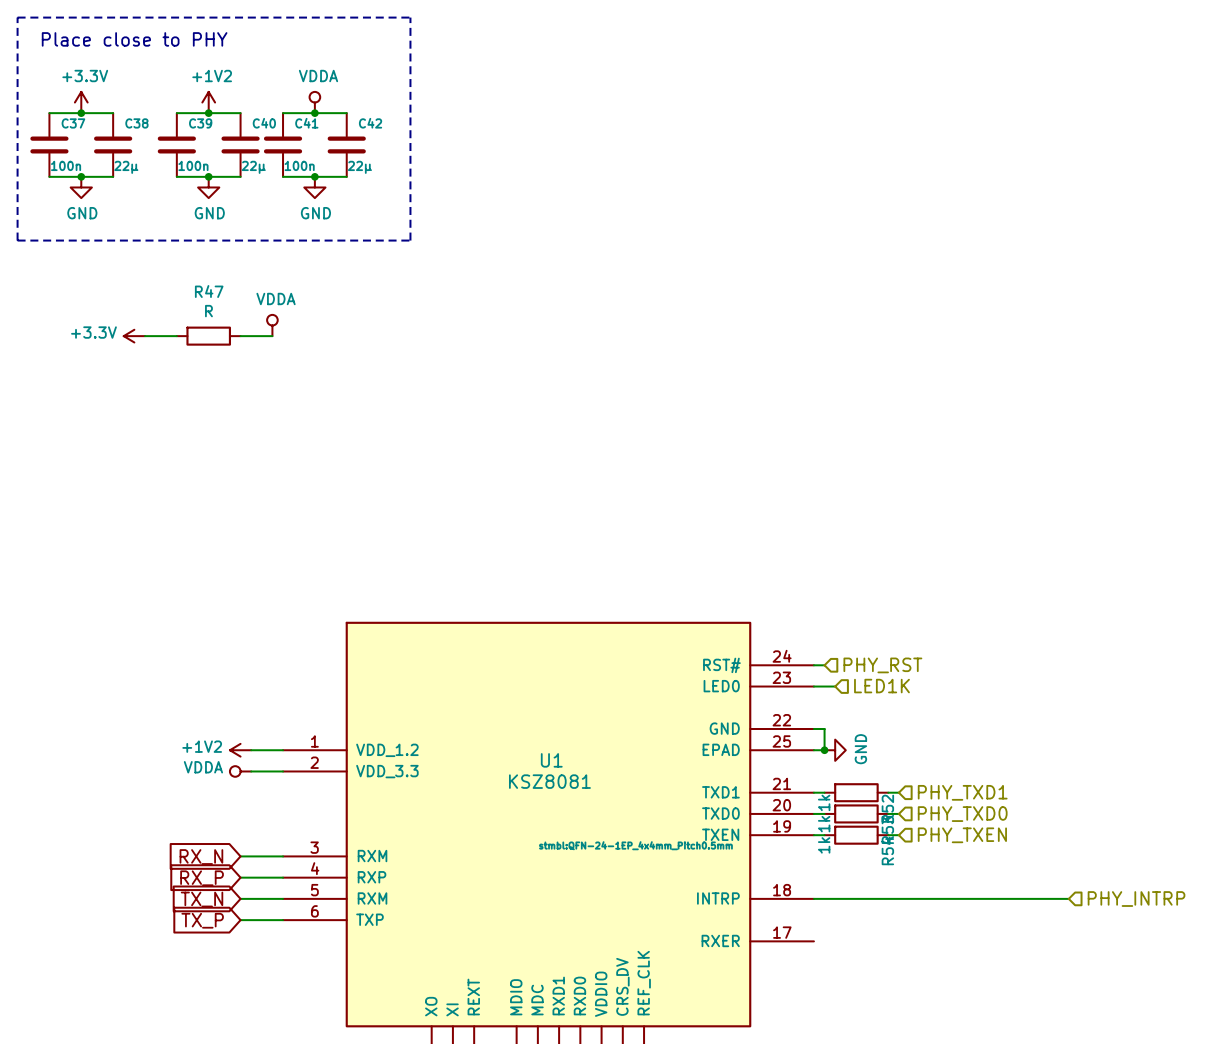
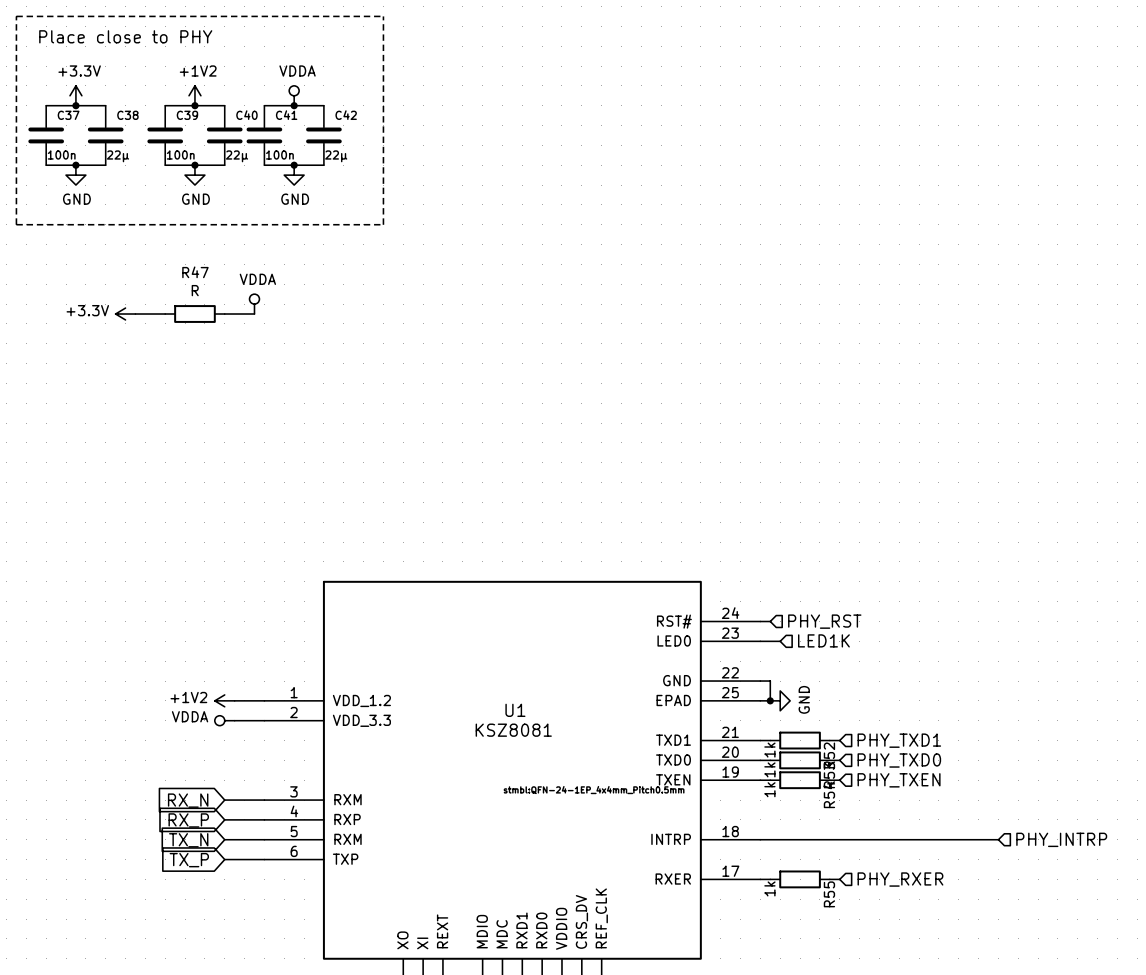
wire: none -> (760, 879) (770, 879)
R55: none -> 1k (800, 879)
wire: none -> (829, 879) (839, 879)
hierarchical label: none -> PHY_RXER (900, 879)

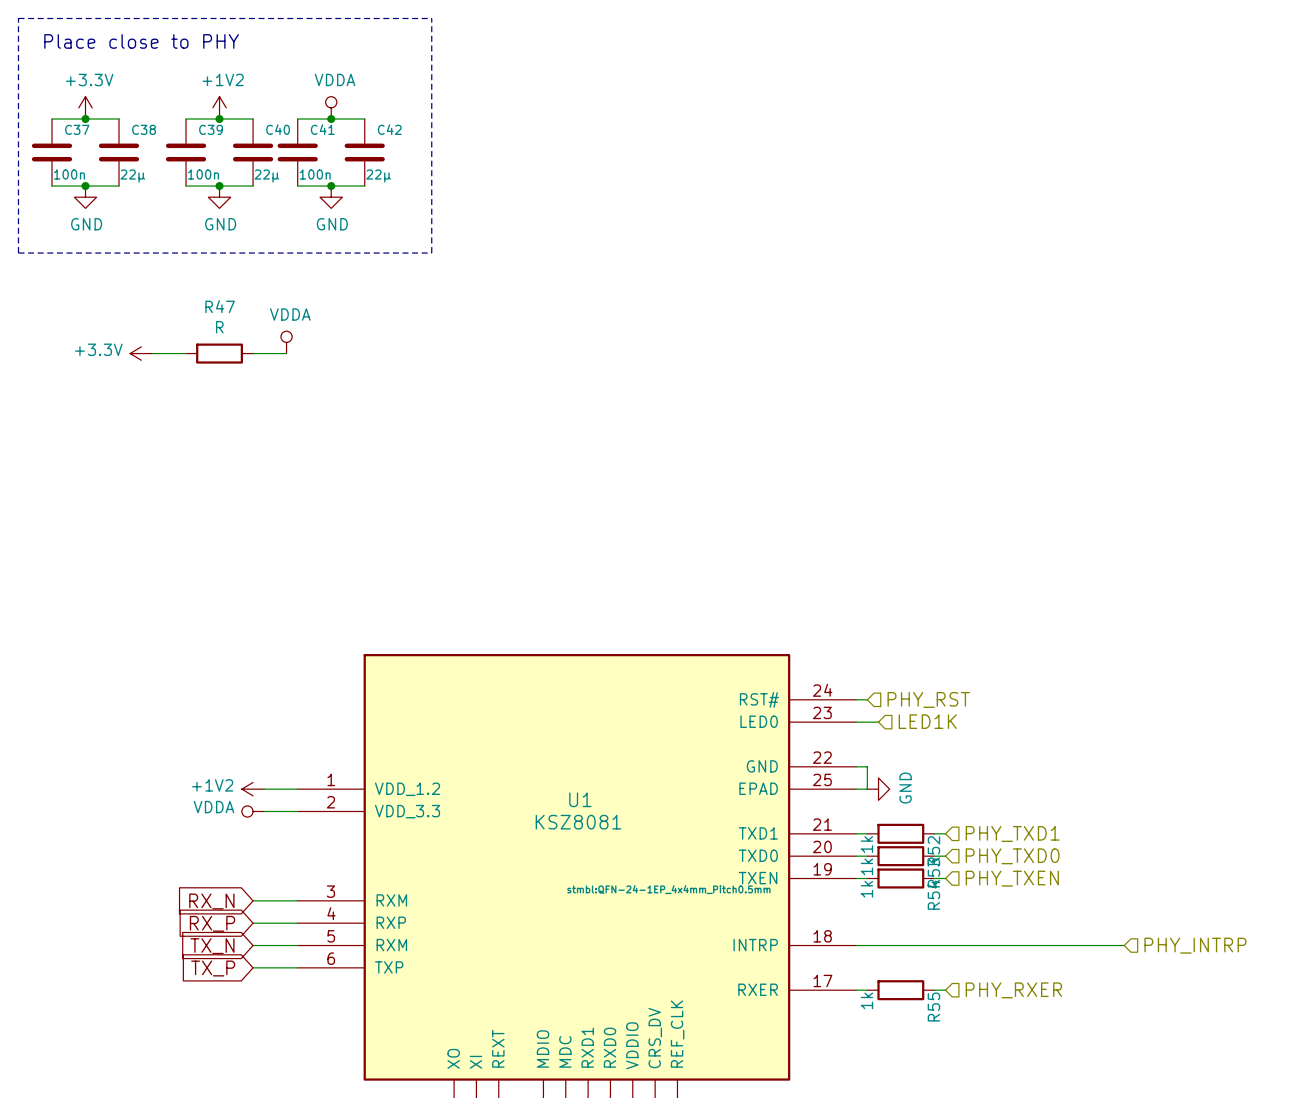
junction: (770, 700) -> none

